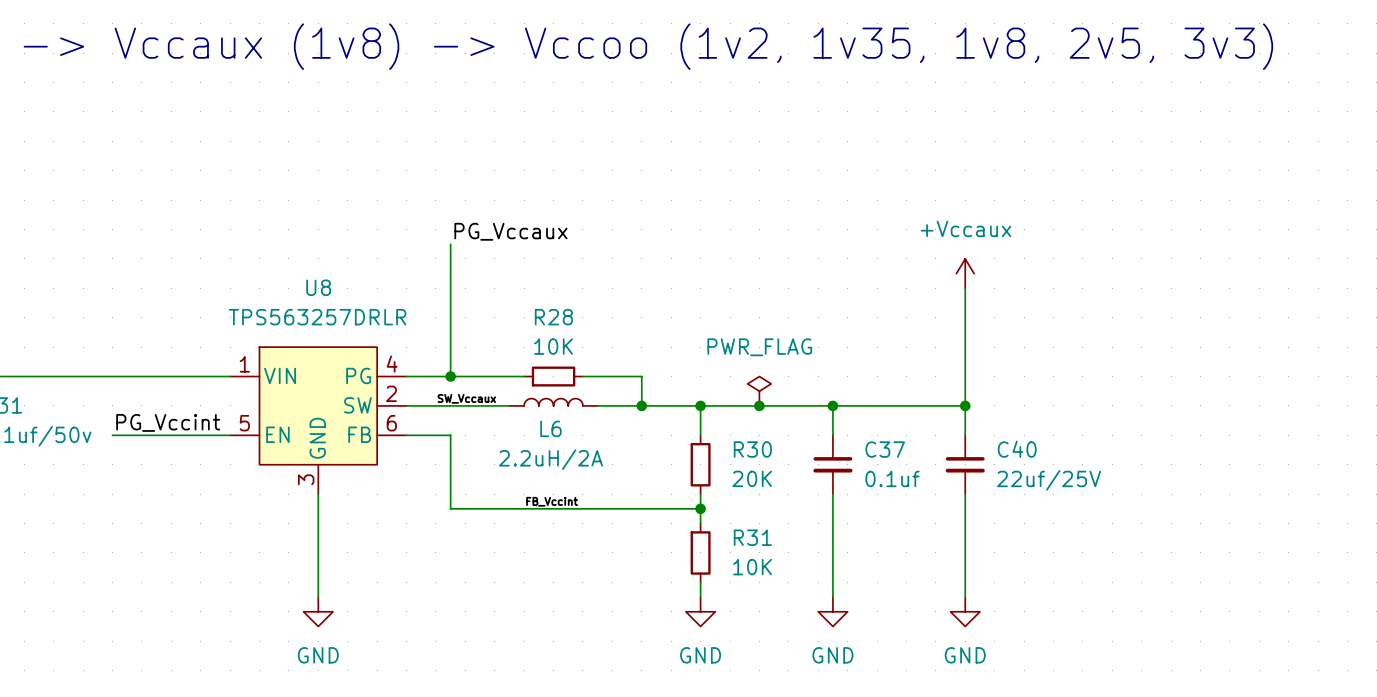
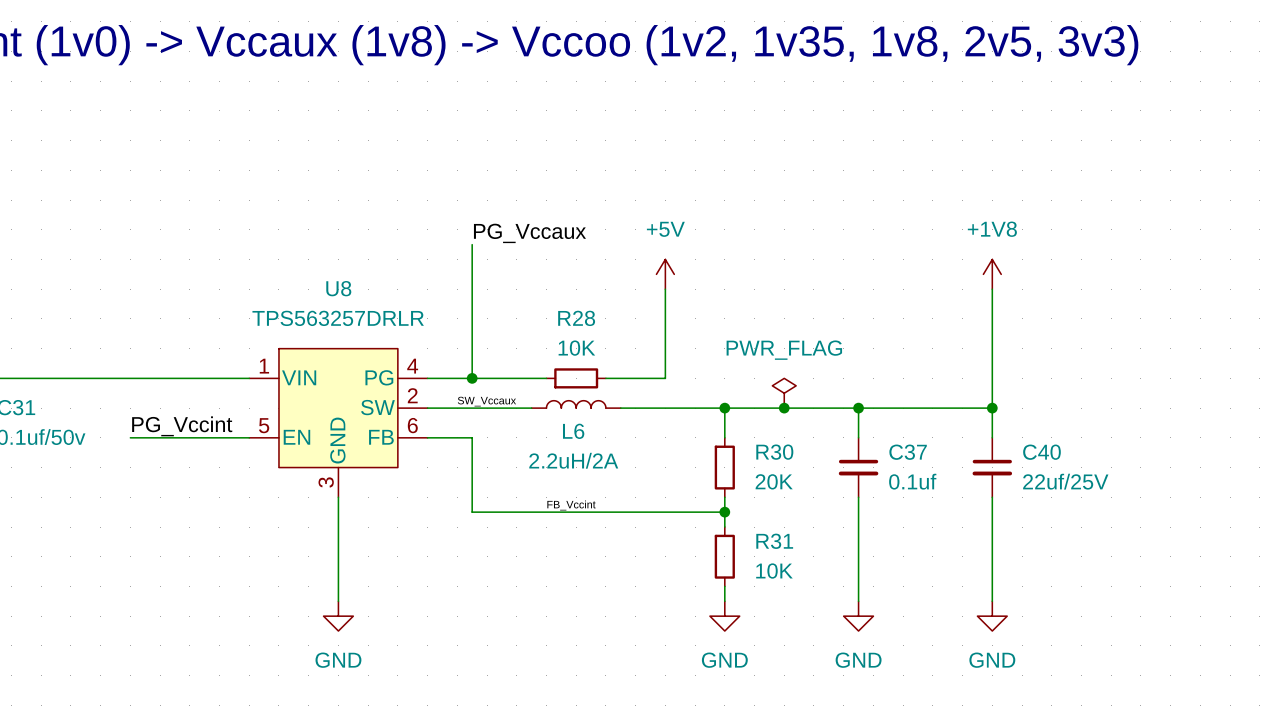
power symbol: none -> +5V (665, 274)
power symbol: +Vccaux (965, 273) -> +1V8 (992, 274)
wire: (641, 376) (641, 405) -> (665, 378) (665, 289)
junction: (641, 405) -> none

